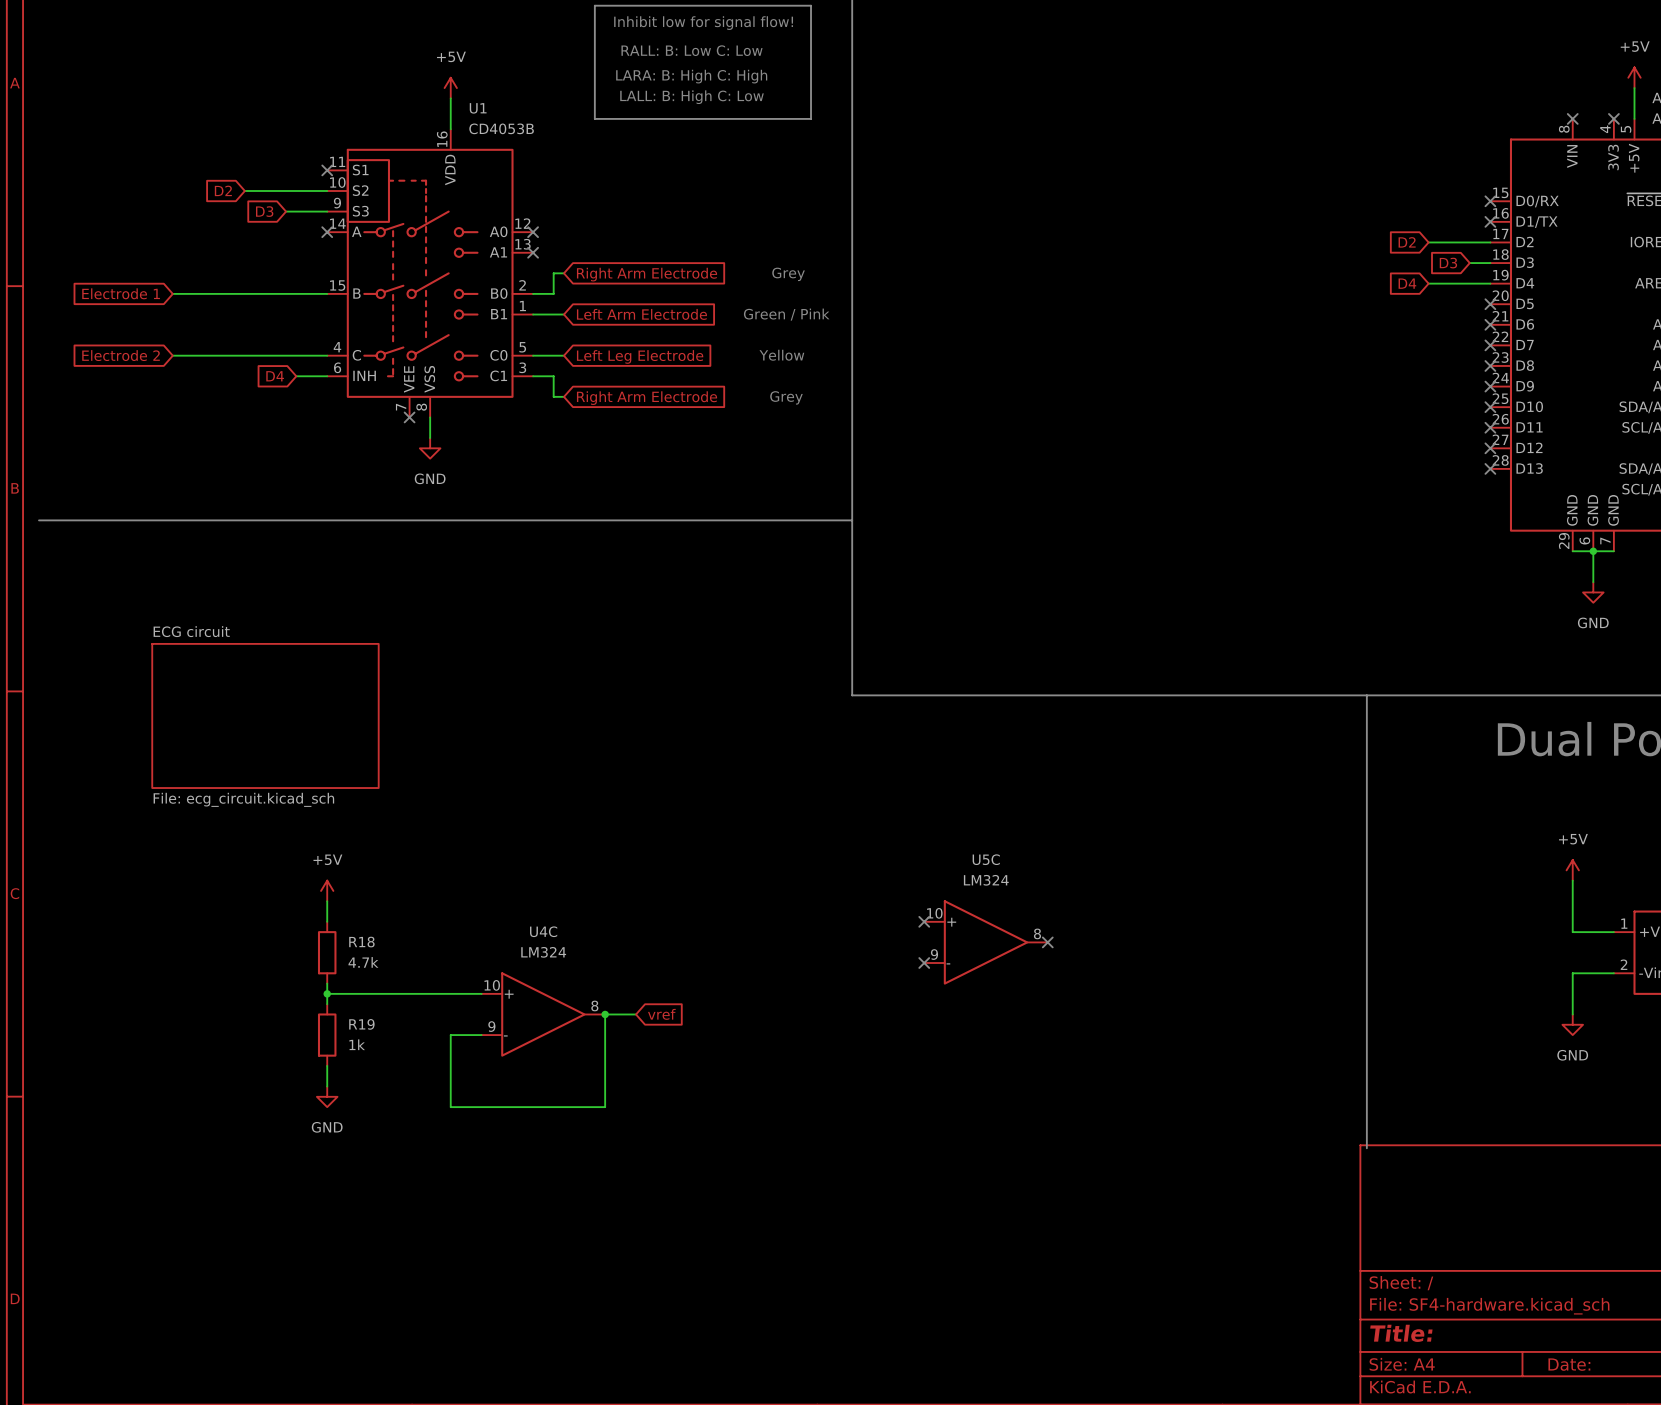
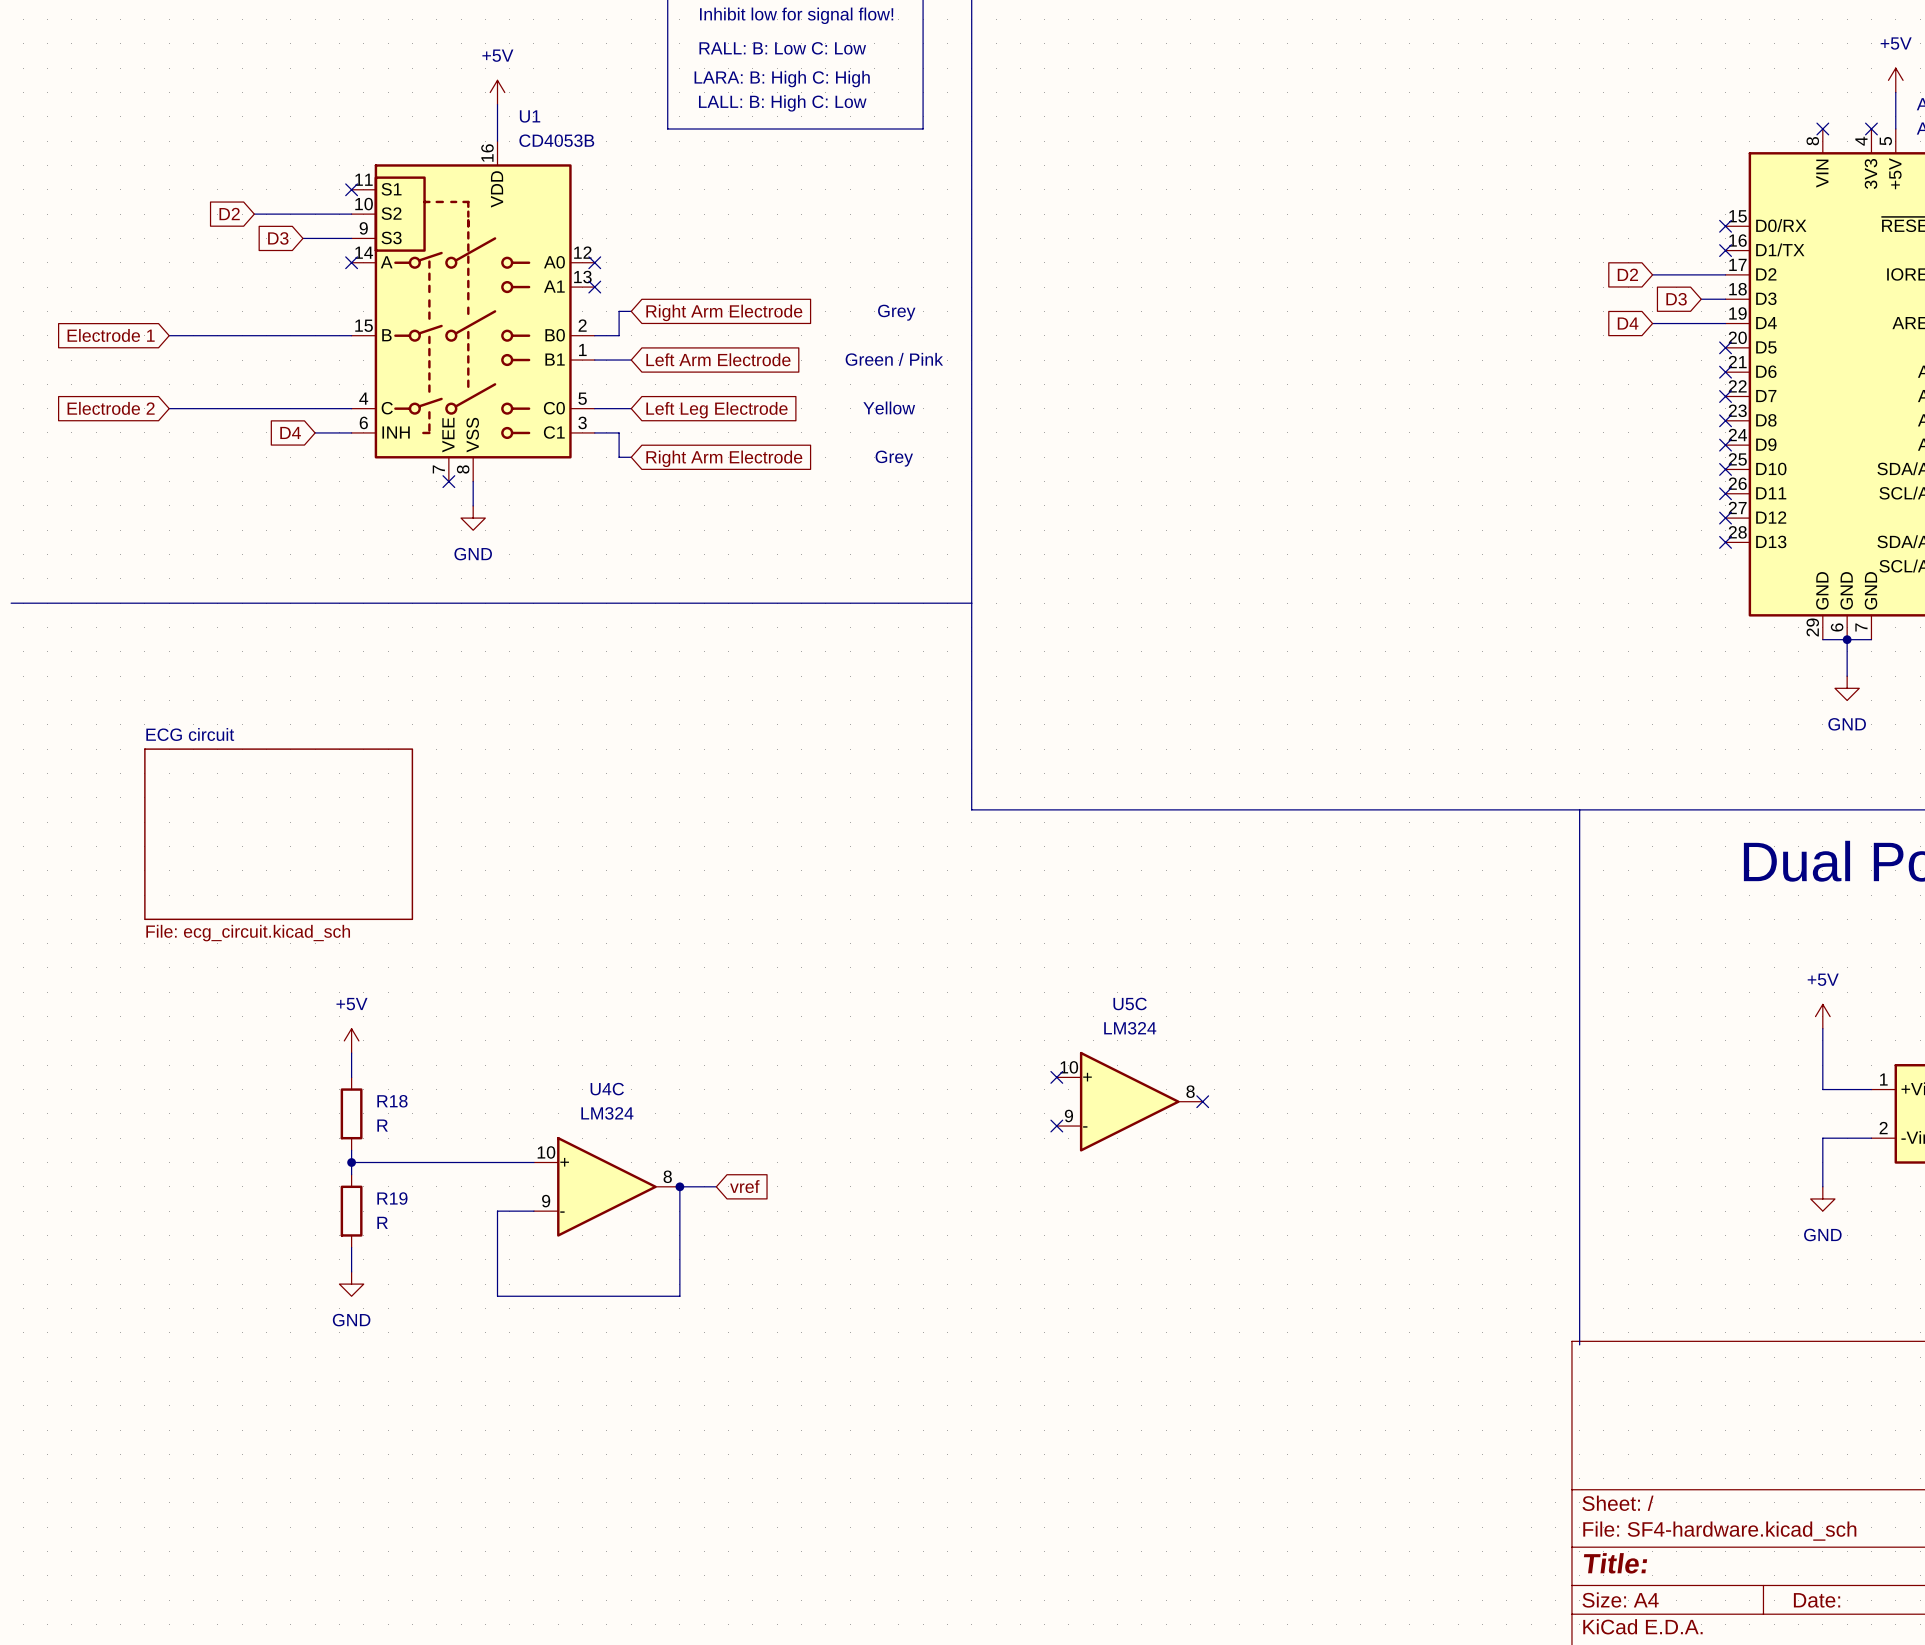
R18 value: 4.7k (363, 962) -> R (382, 1125)
R19 value: 1k (357, 1044) -> R (382, 1222)

